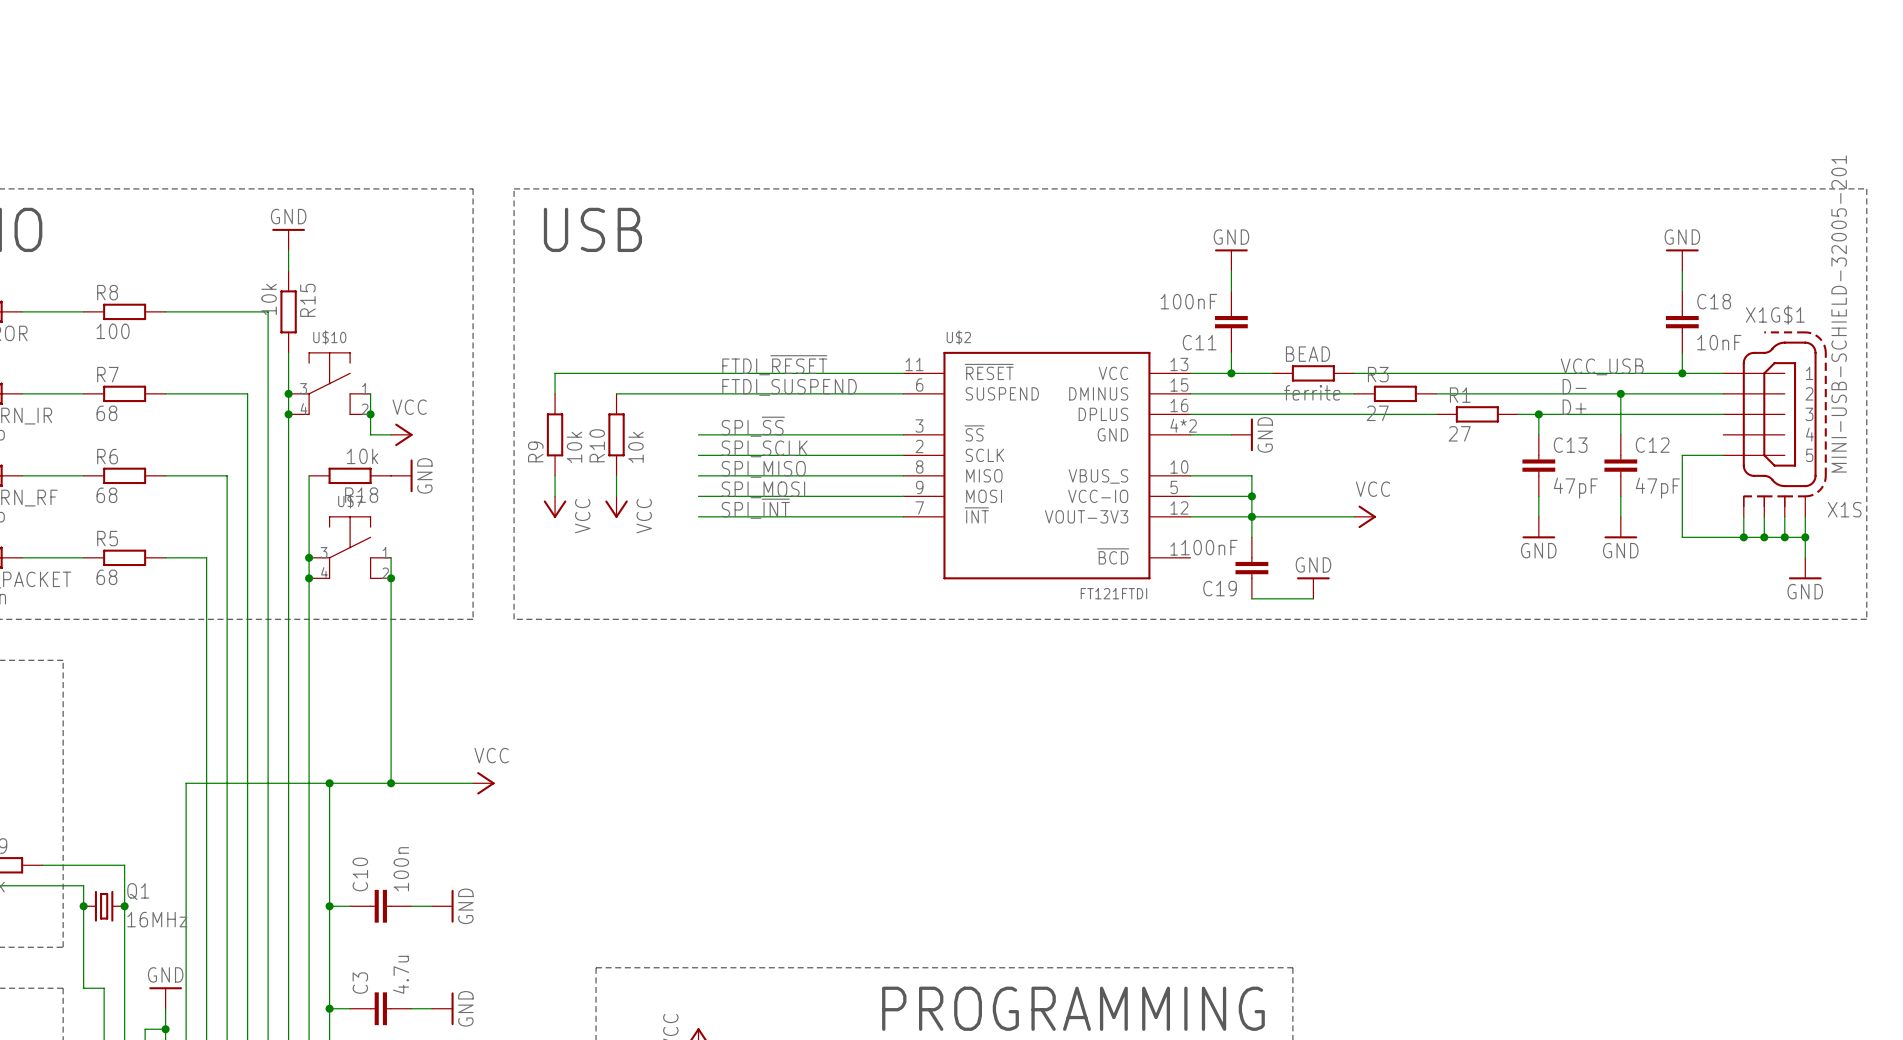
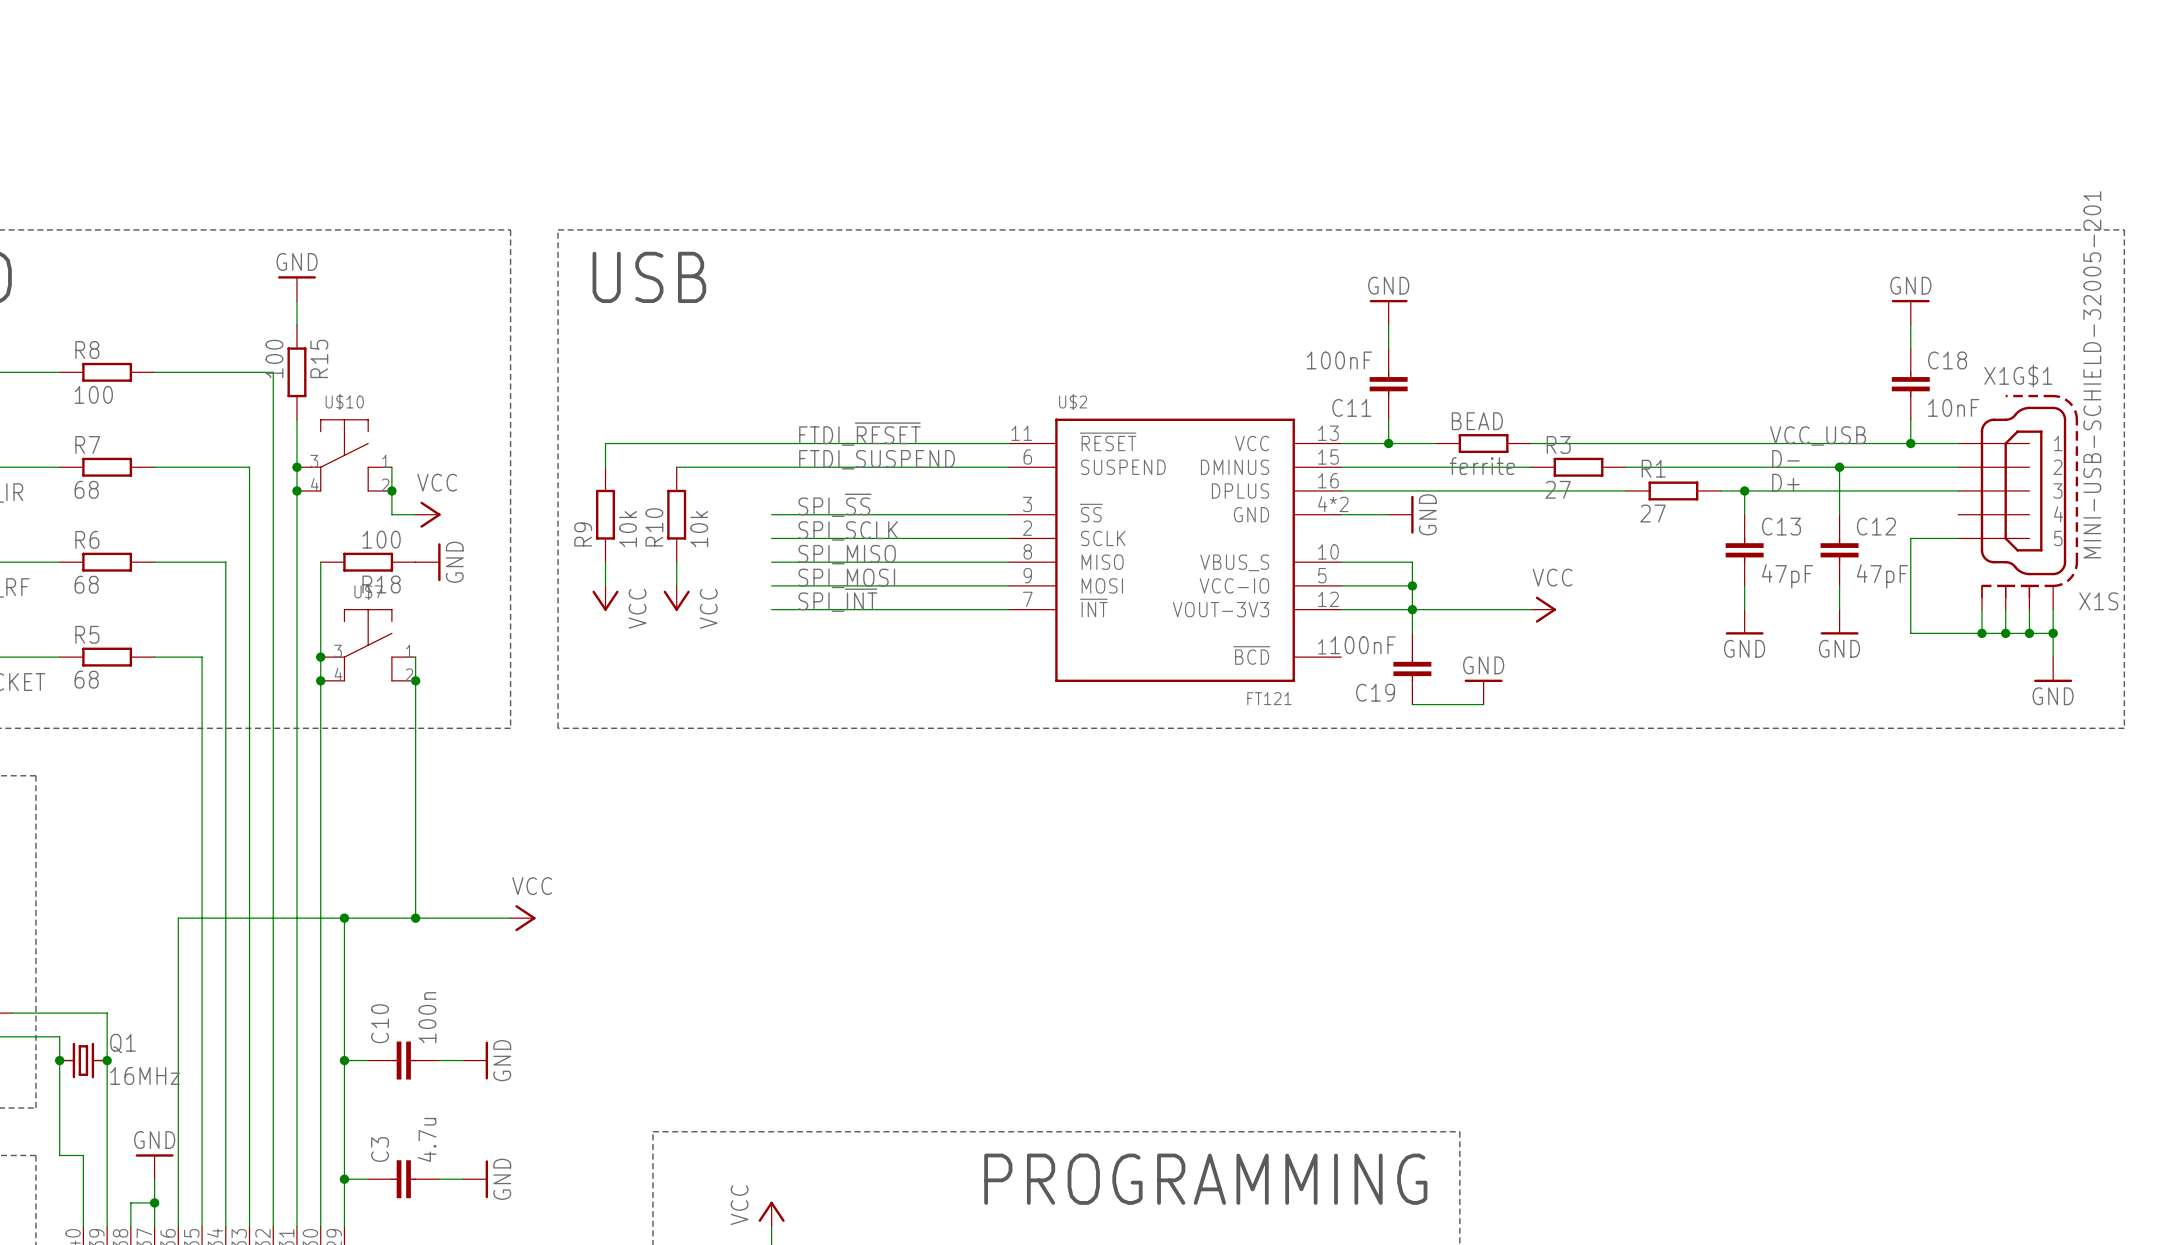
R15 value: 10k (269, 299) -> 100 (274, 358)
R18 value: 10k (362, 456) -> 100 (381, 539)
U$2 value: FT121FTDI (1113, 593) -> FT121 (1269, 698)

